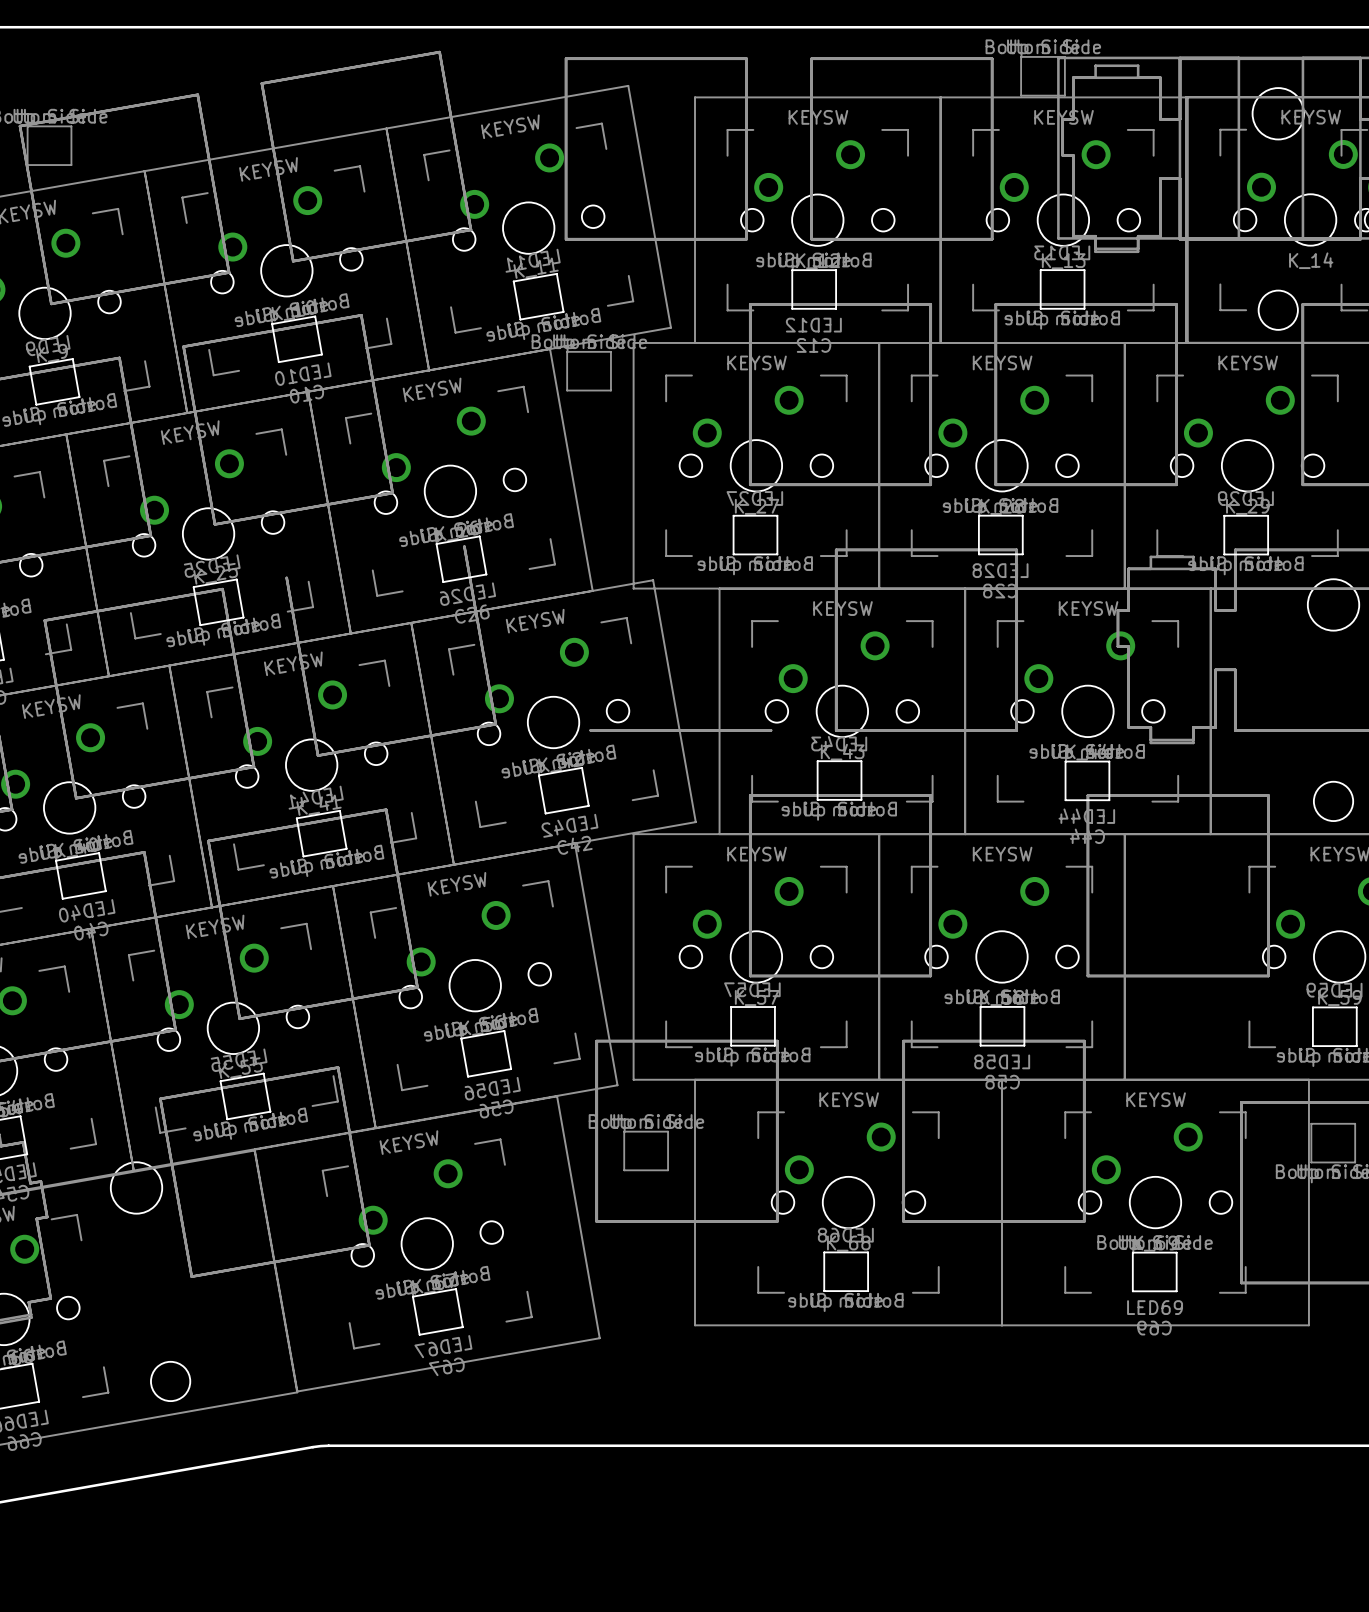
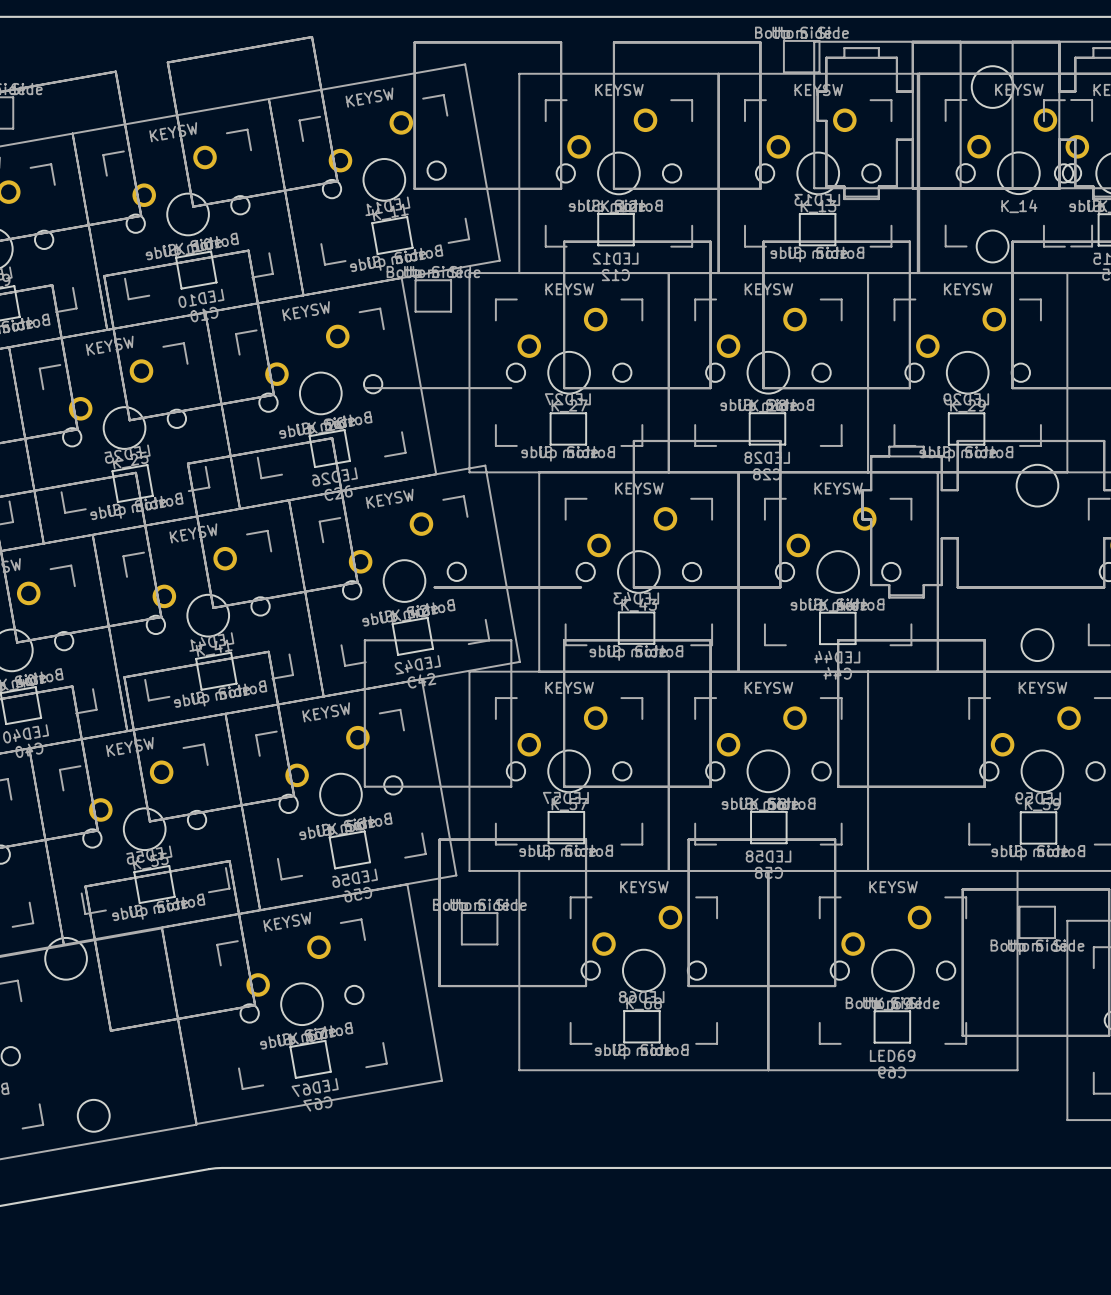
line: none -> (364, 388) (511, 388)
line: none -> (187, 463) (332, 438) (187, 463)
line: none -> (364, 640) (364, 786)
line: none -> (364, 640) (511, 640)
line: none -> (511, 640) (511, 786)
line: none -> (364, 786) (511, 786)

